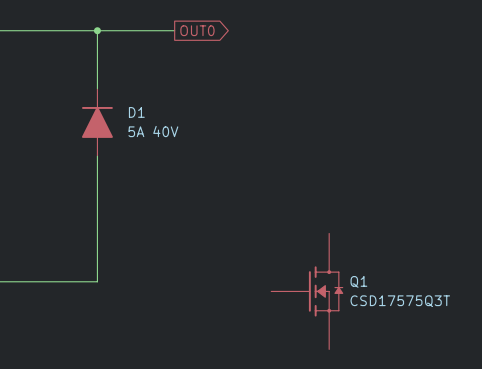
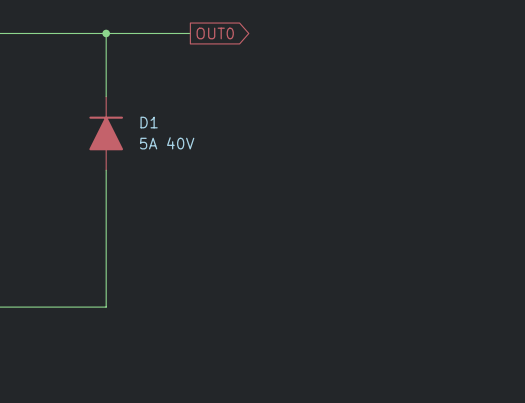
Q1: CSD17575Q3T (307, 291) -> none

